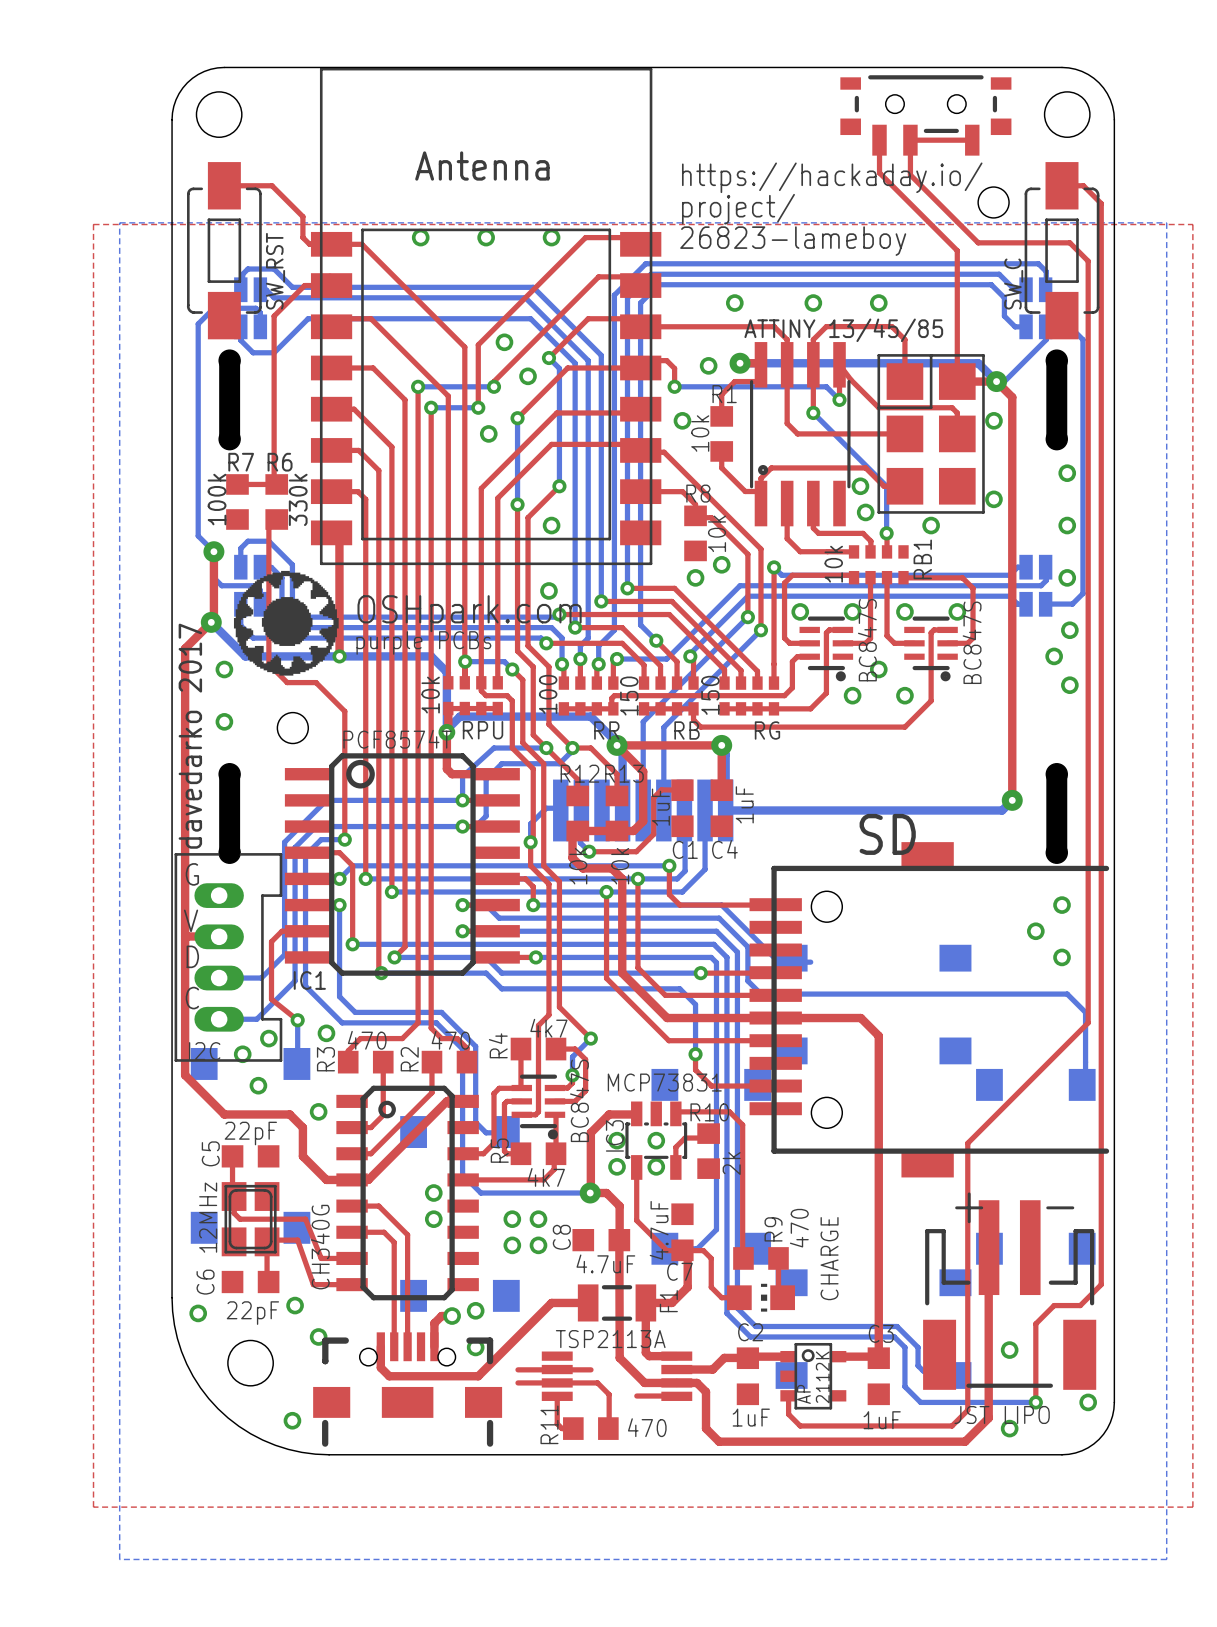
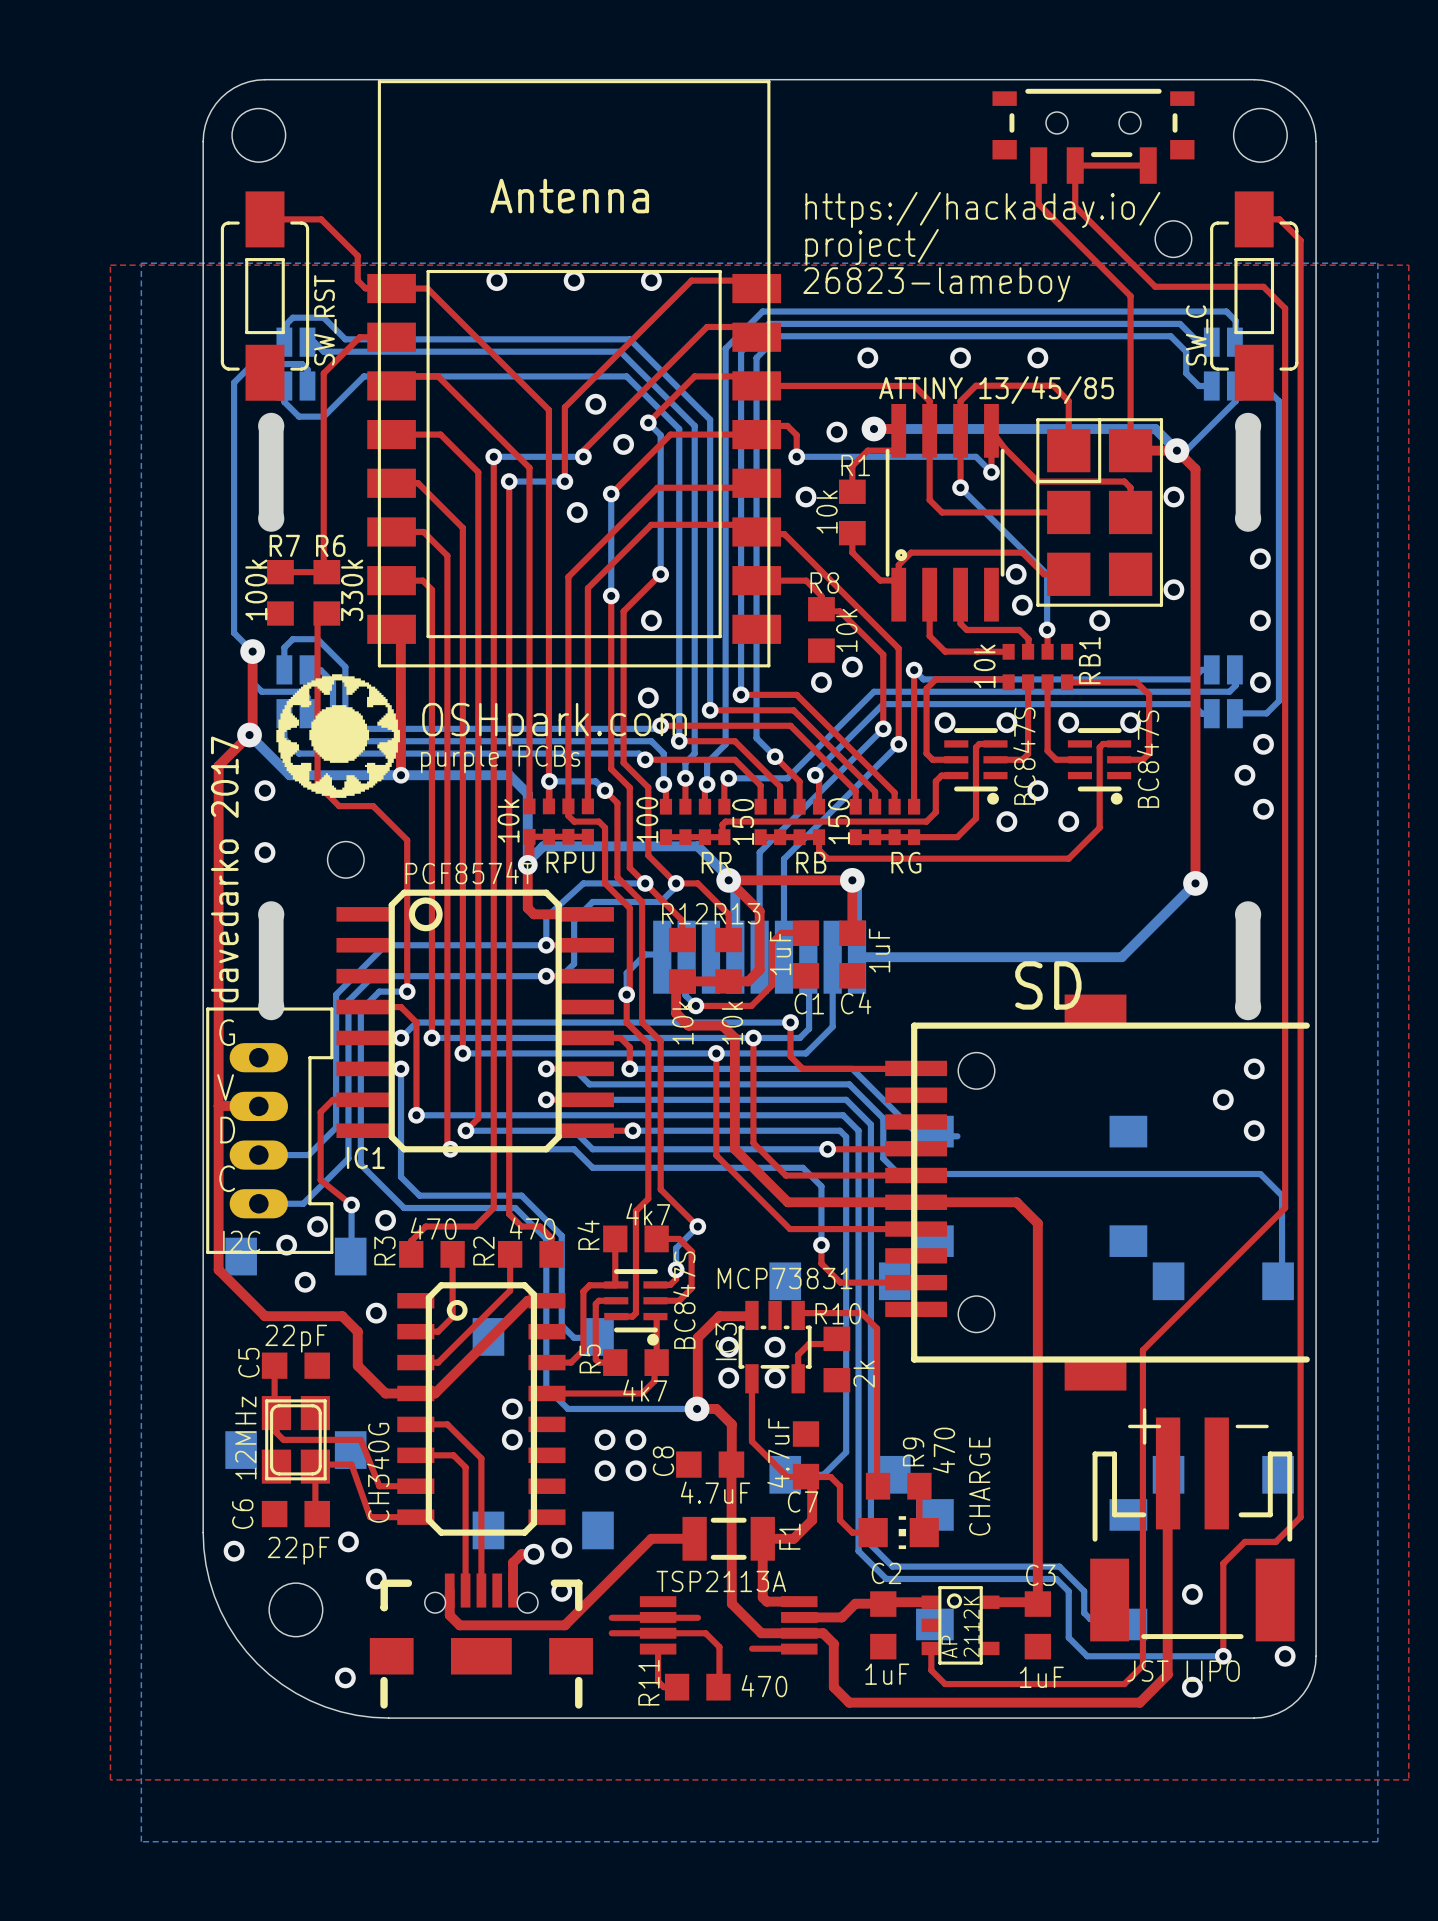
top track: (1012, 748) (1012, 800) -> none
bottom track: (1012, 800) (1002, 810) (949, 810) -> (1195, 883) (1121, 957)
via position: (1012, 800) -> (1195, 883)

